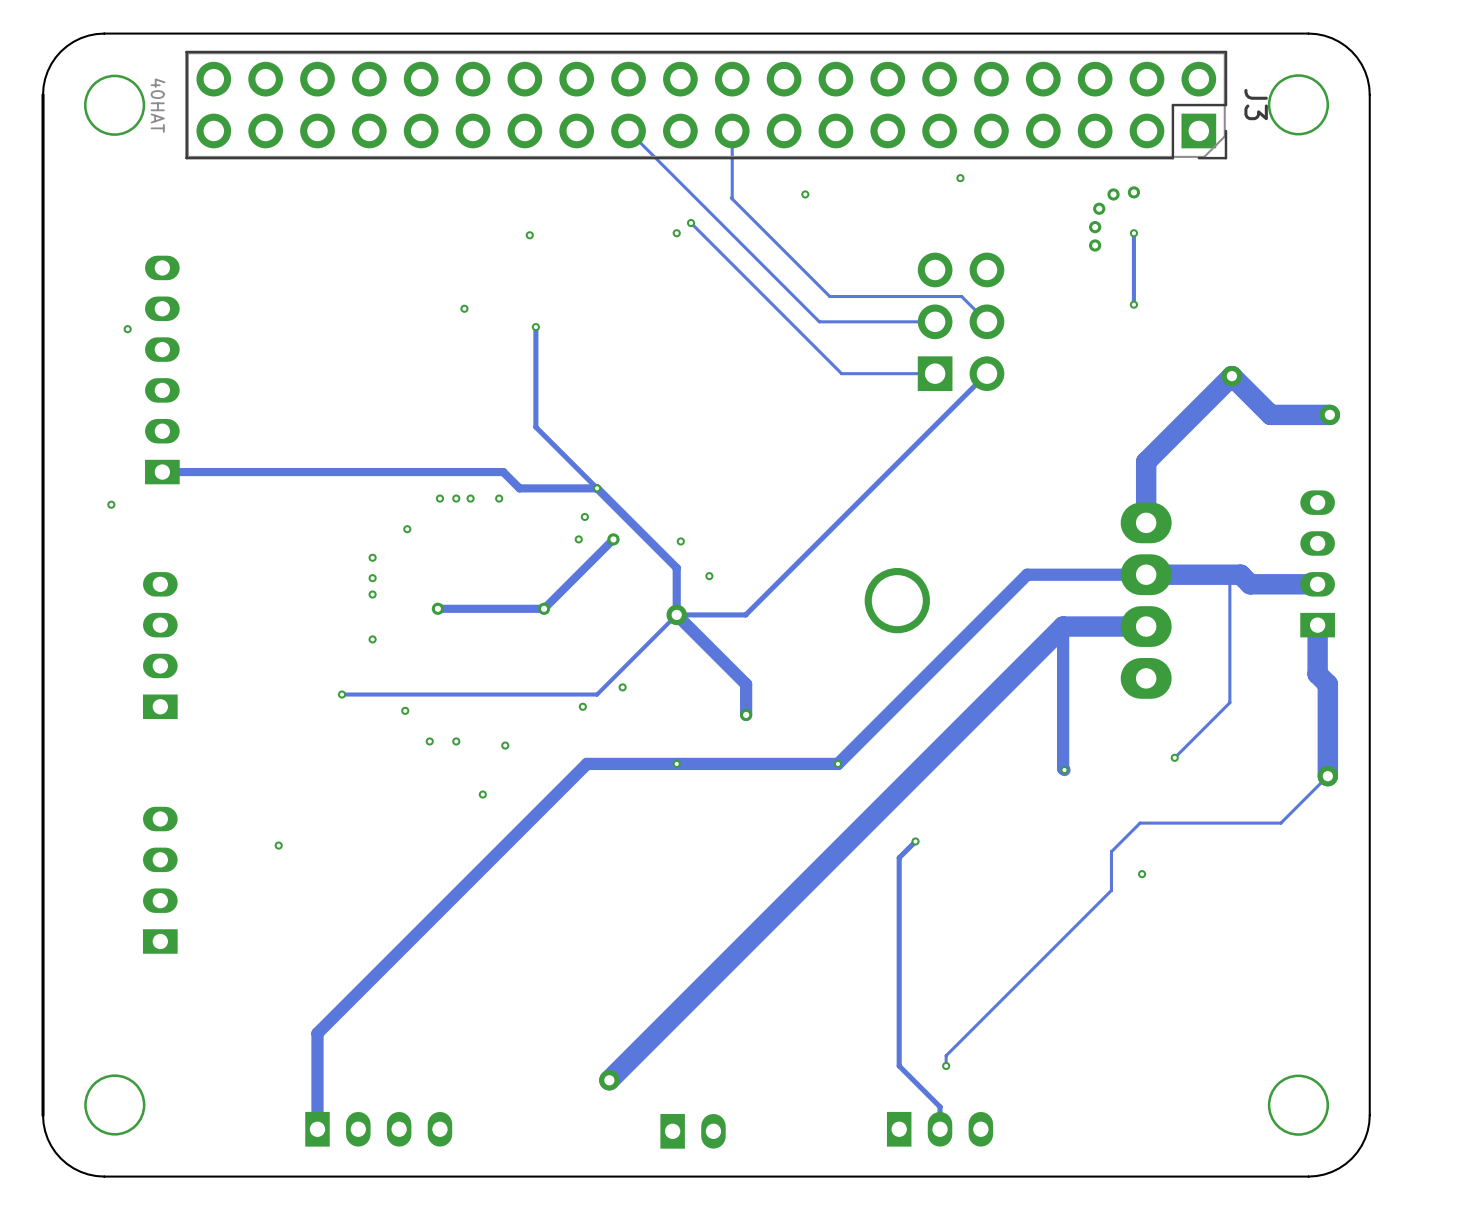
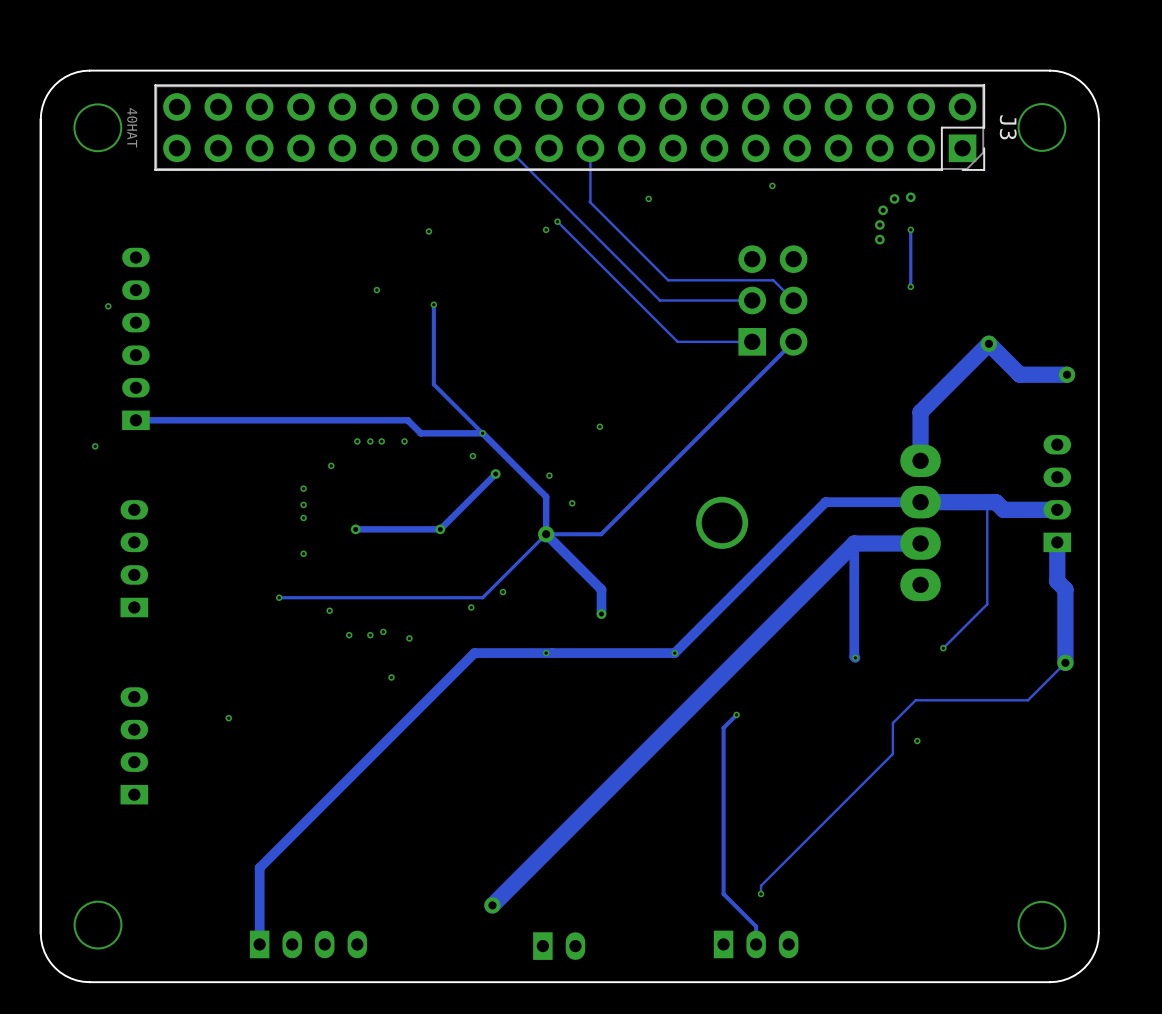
via: none -> (599, 426)
via: (578, 539) -> none
via: none -> (383, 631)

